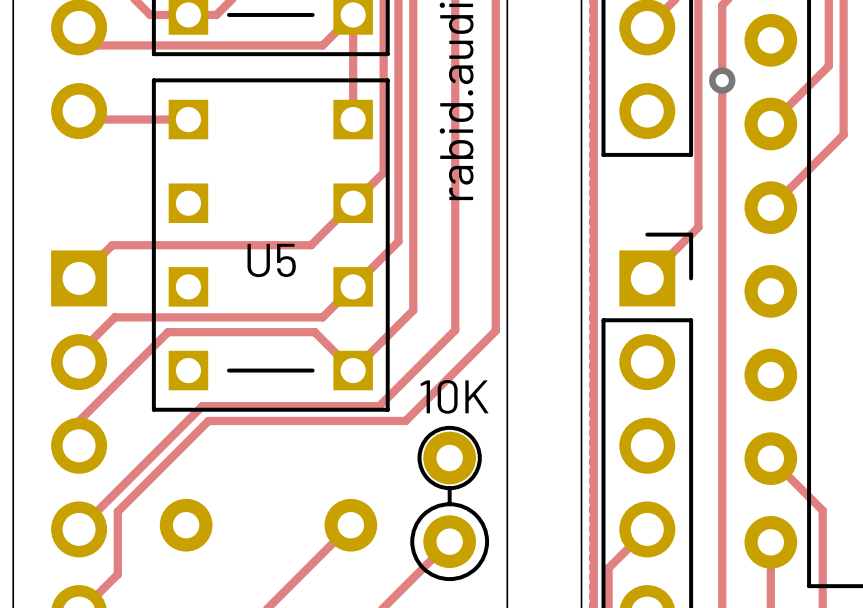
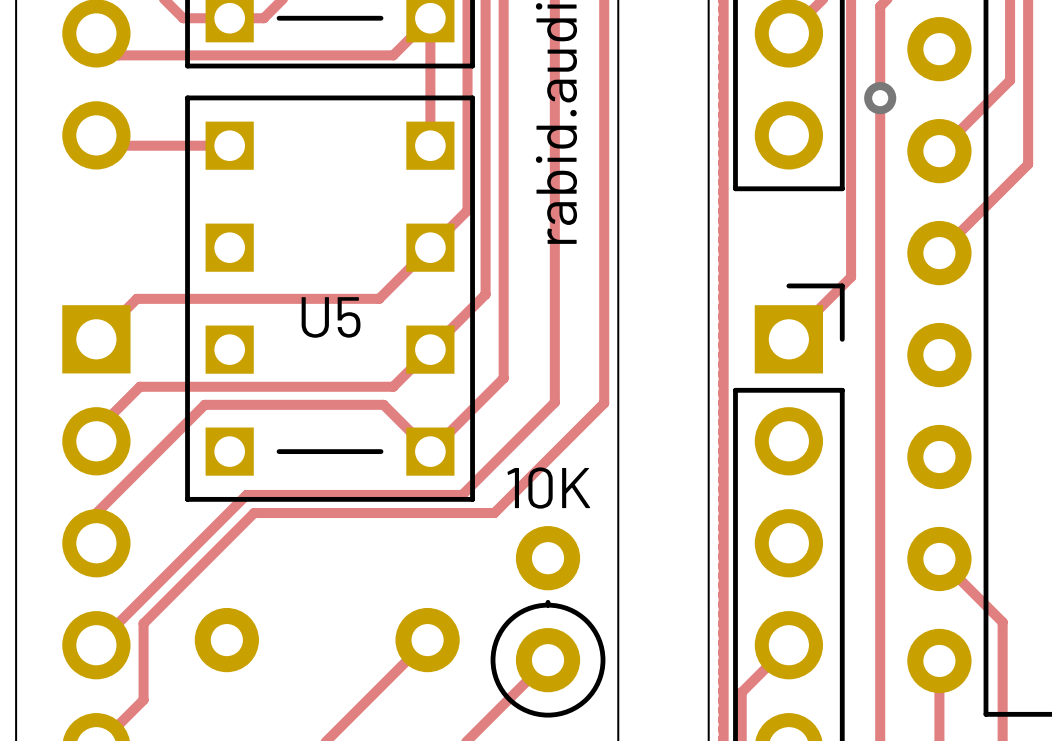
part footprint: [410, 425, 490, 582] -> [490, 526, 606, 718]

